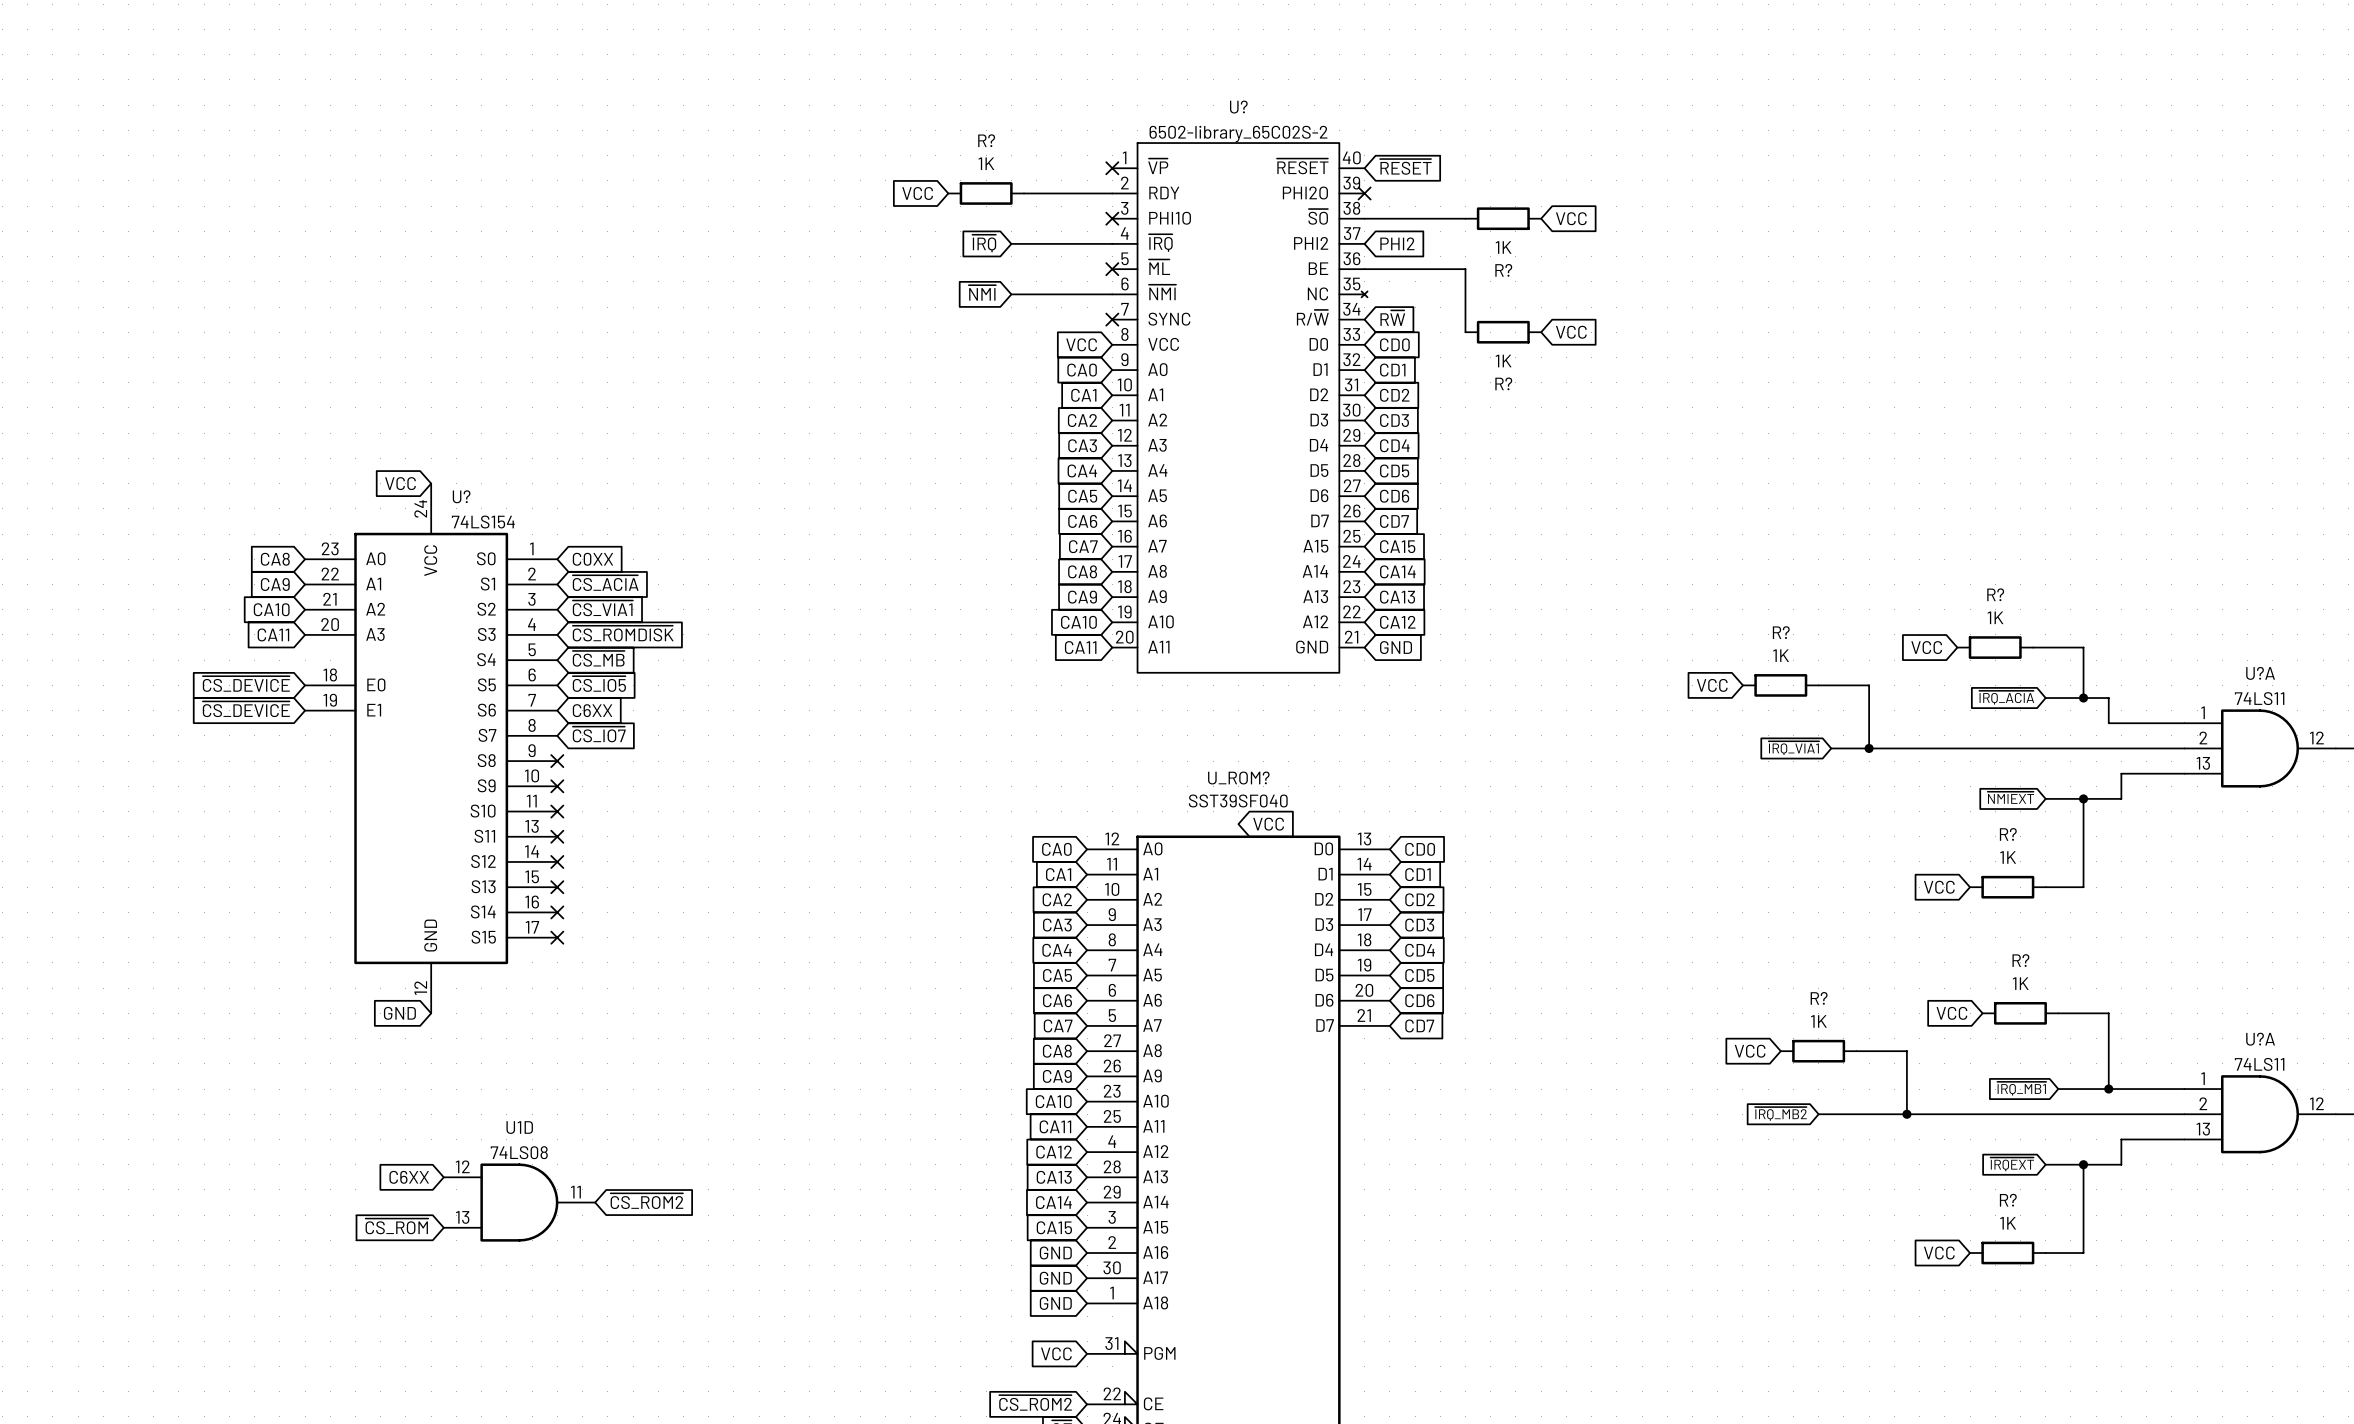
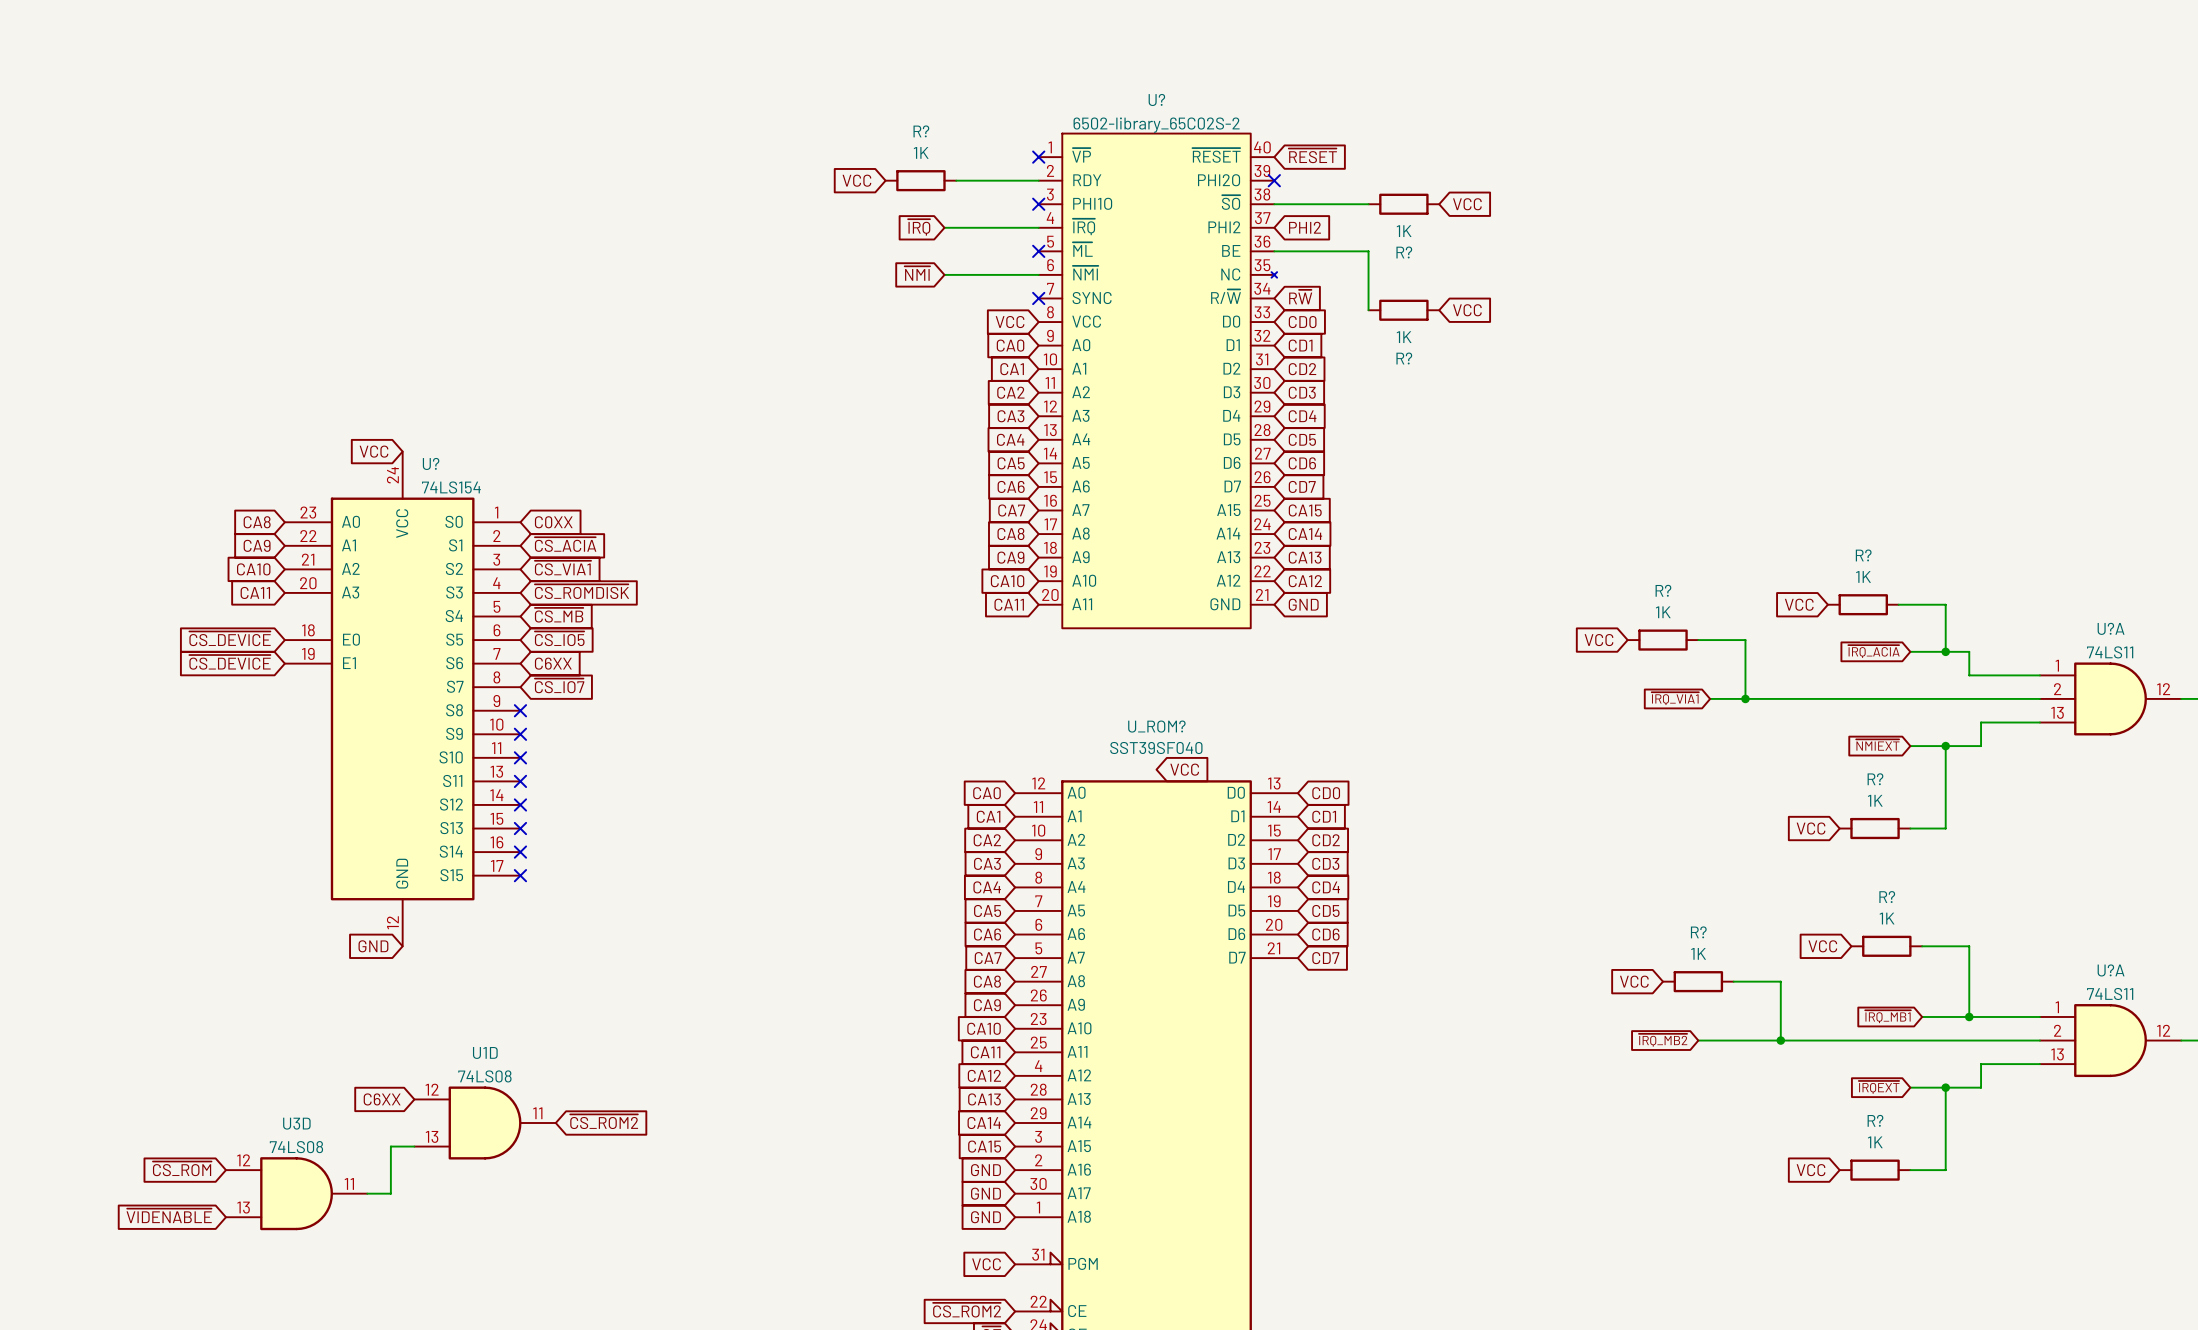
global label position: ~{CS_ROM} (396, 1226) -> ~{CS_ROM} (182, 1168)
wire: none -> (414, 1146) (390, 1146) (390, 1193) (367, 1193)
U3D: none -> 74LS08 (296, 1193)
global label: none -> ~{VIDENABLE} (169, 1215)

